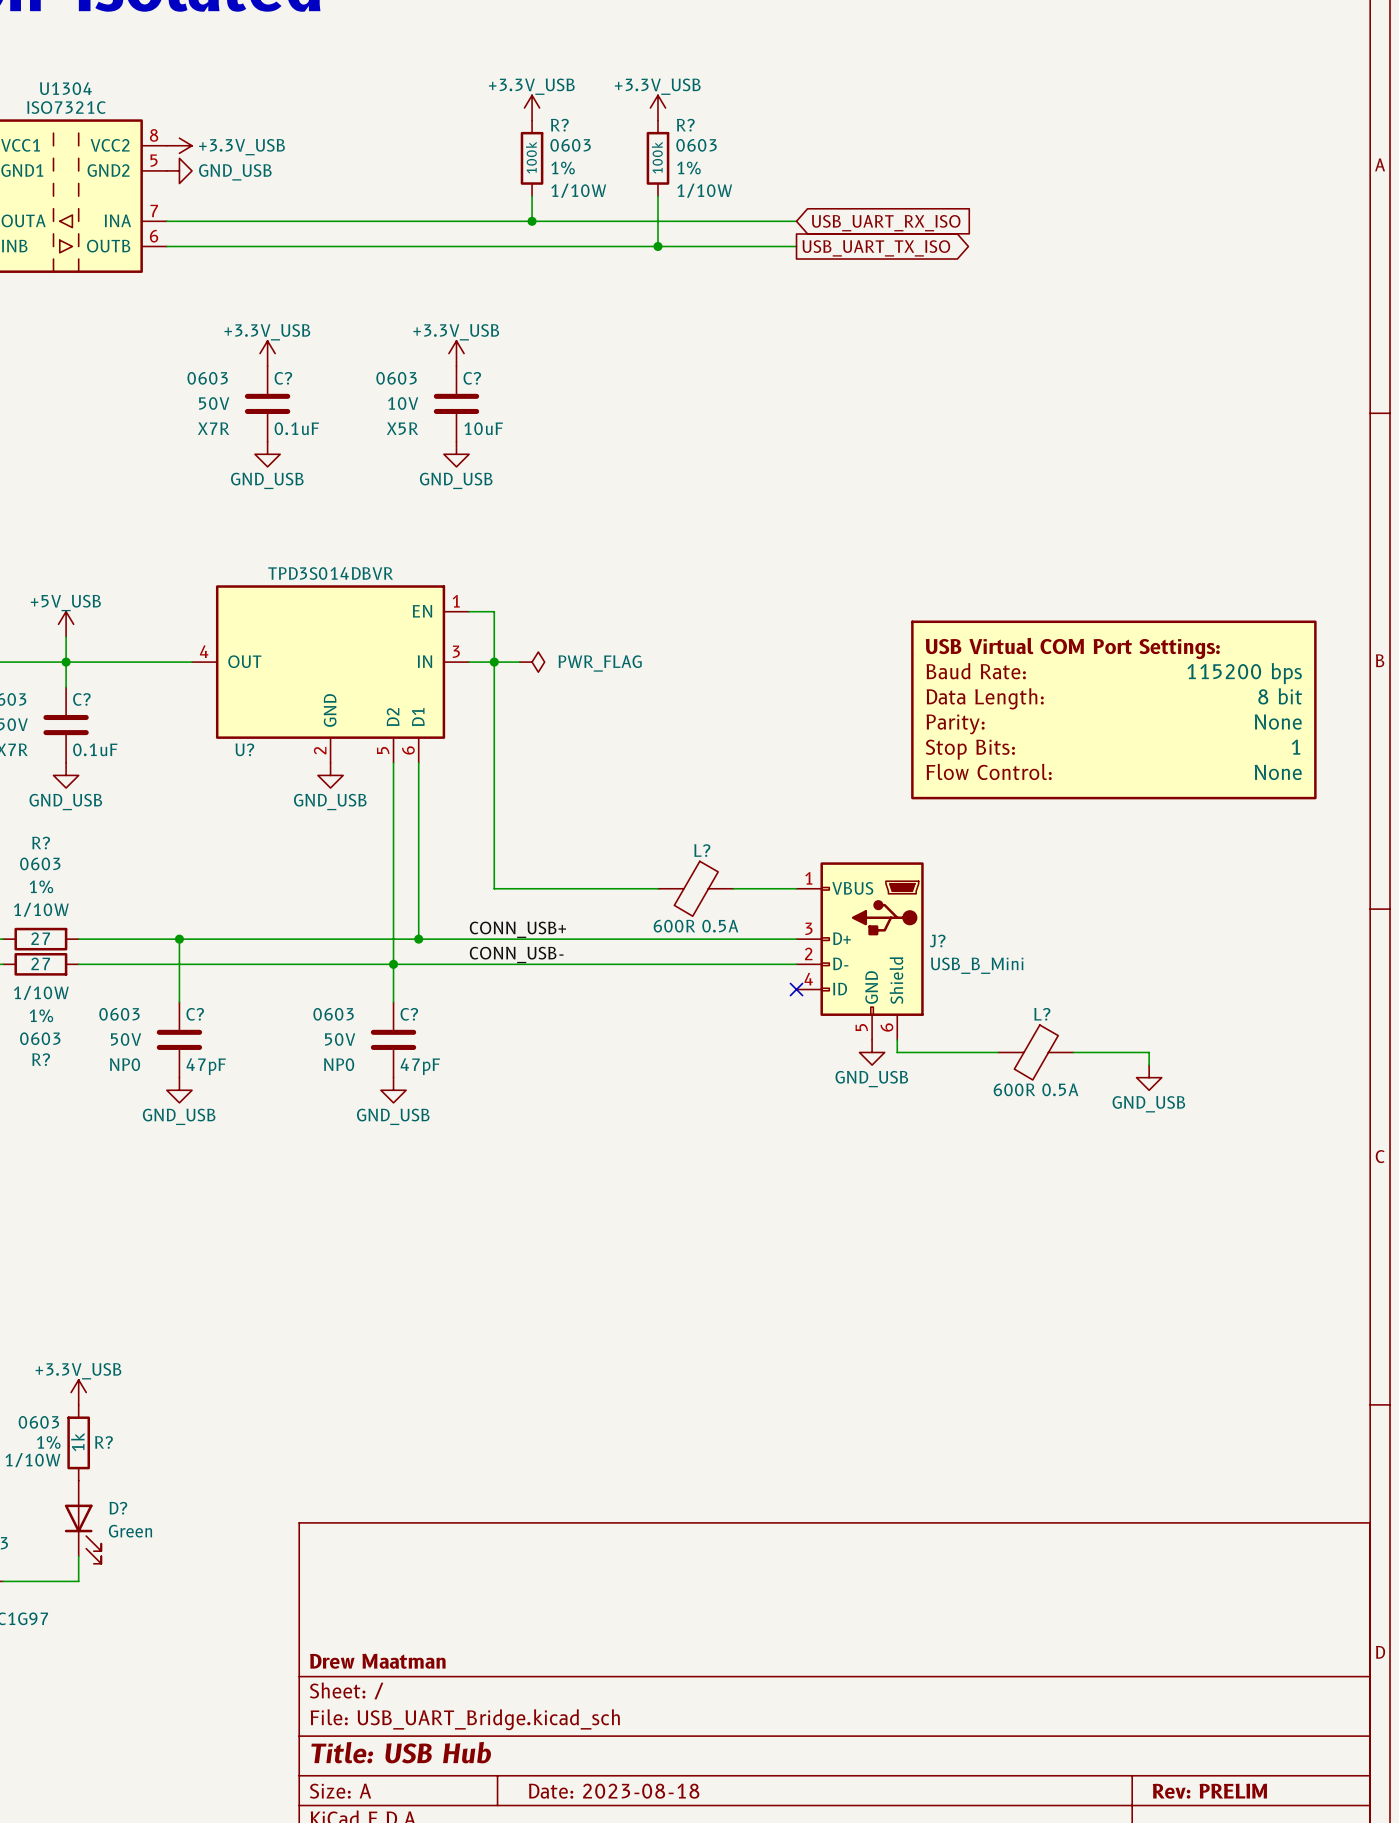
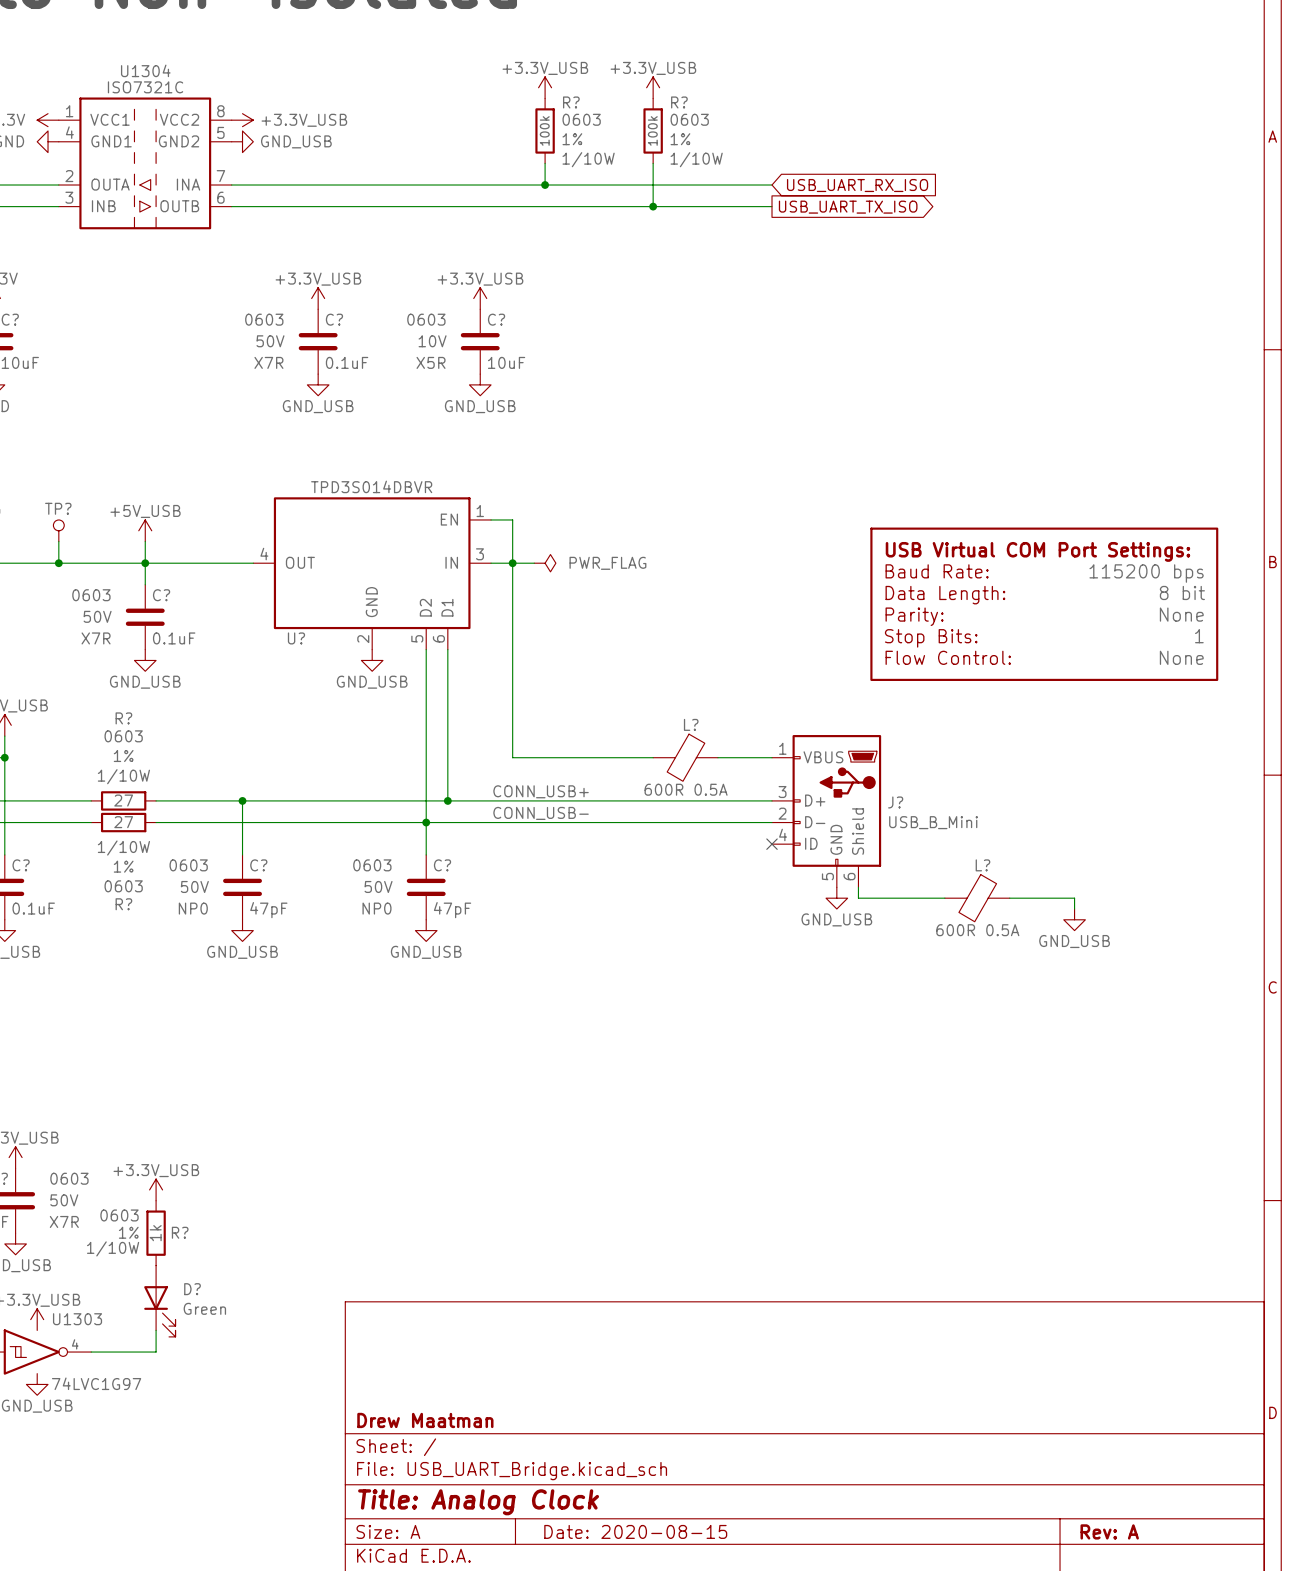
title block: Title: USB Hub (401, 1752) -> Title: Analog Clock (478, 1502)
title block: Date: 2023-08-18 (614, 1791) -> Date: 2020-08-15 (635, 1531)
title block: Rev: PRELIM (1209, 1791) -> Rev: A (1109, 1531)

